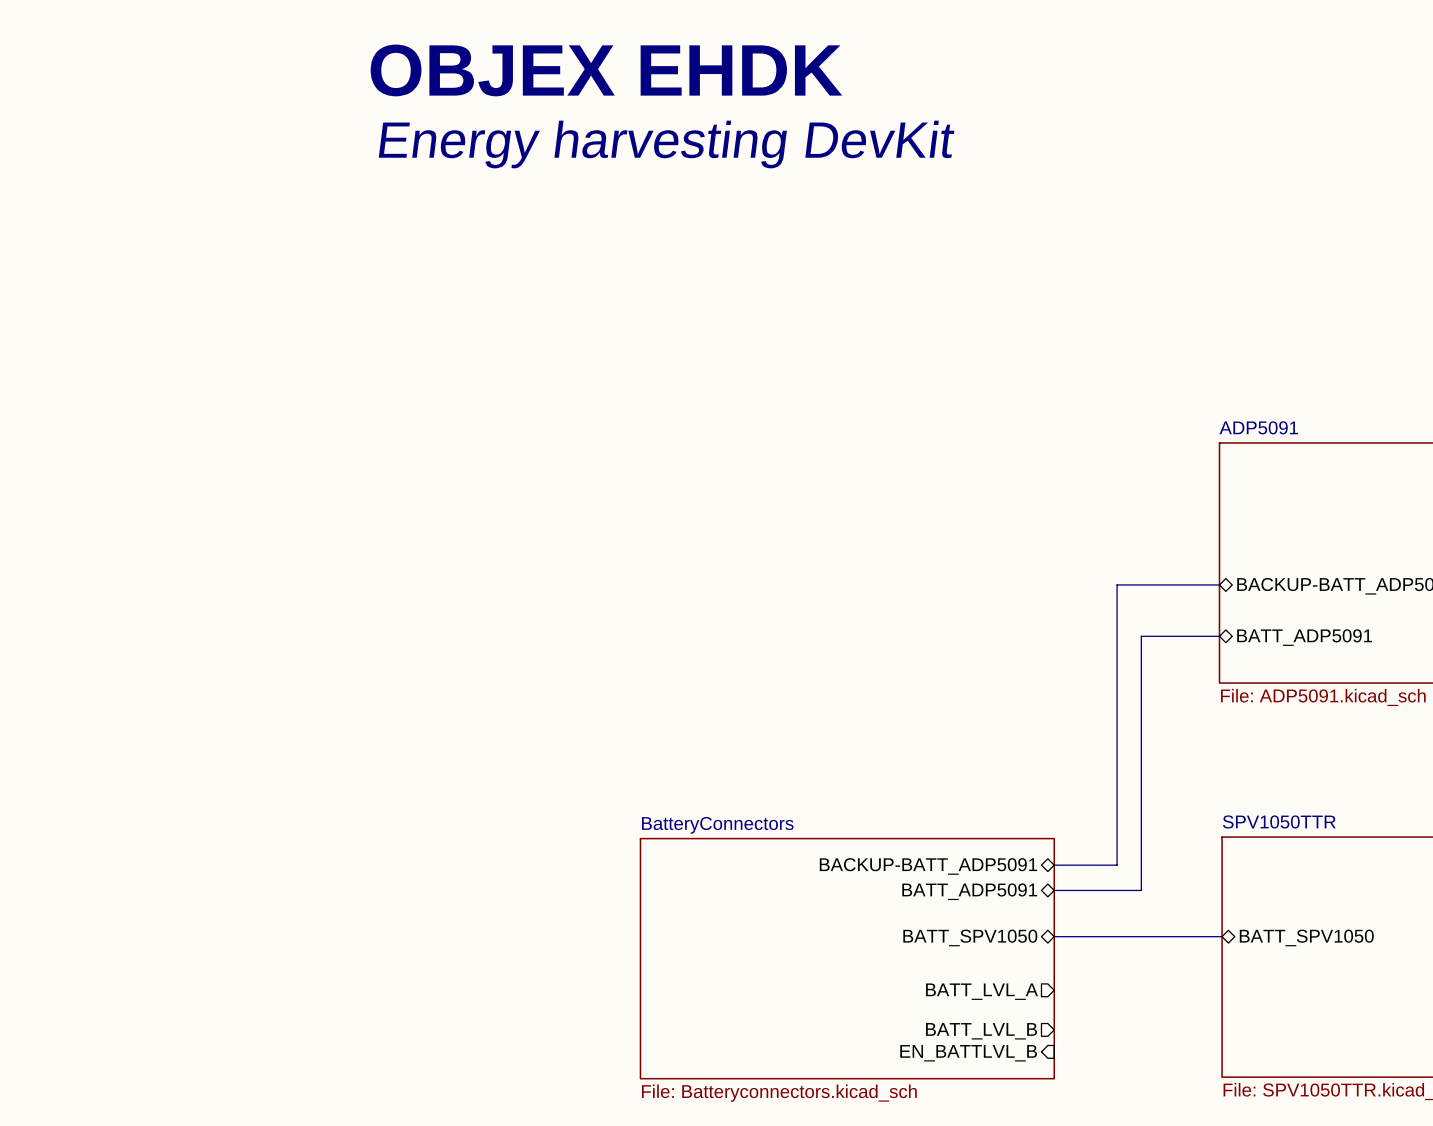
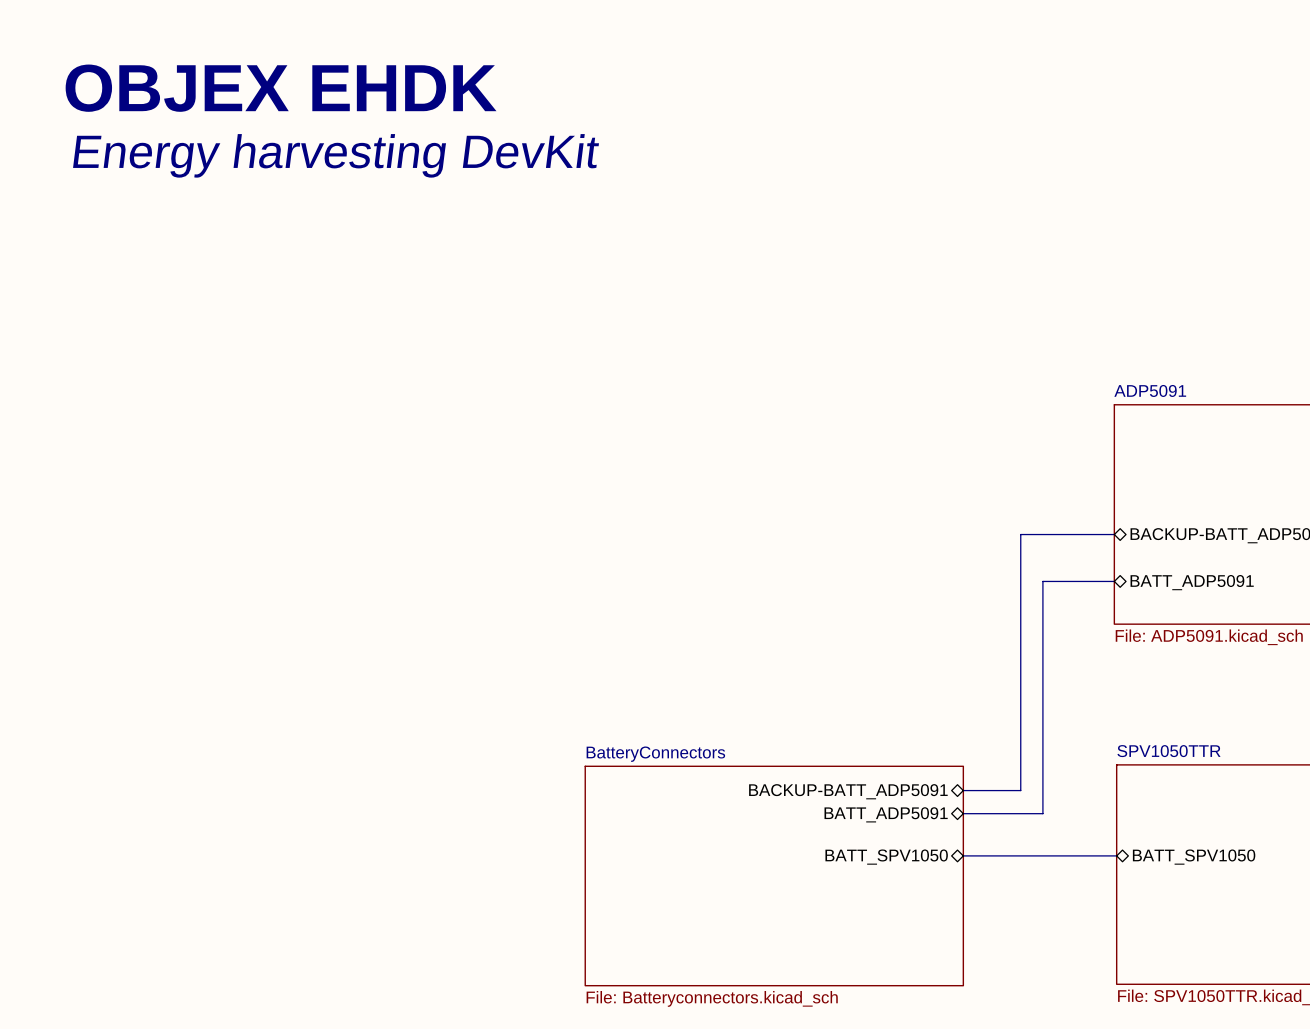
text: OBJEX EHDK (606, 70) -> none
text: none -> OBJEX EHDK (281, 88)
text: Energy harvesting DevKit (666, 144) -> none
text: none -> Energy harvesting DevKit (336, 155)
sheet pin: BATT_LVL_A (982, 991) -> none
sheet pin: BATT_LVL_B (981, 1031) -> none
sheet pin: EN_BATTLVL_B (968, 1053) -> none

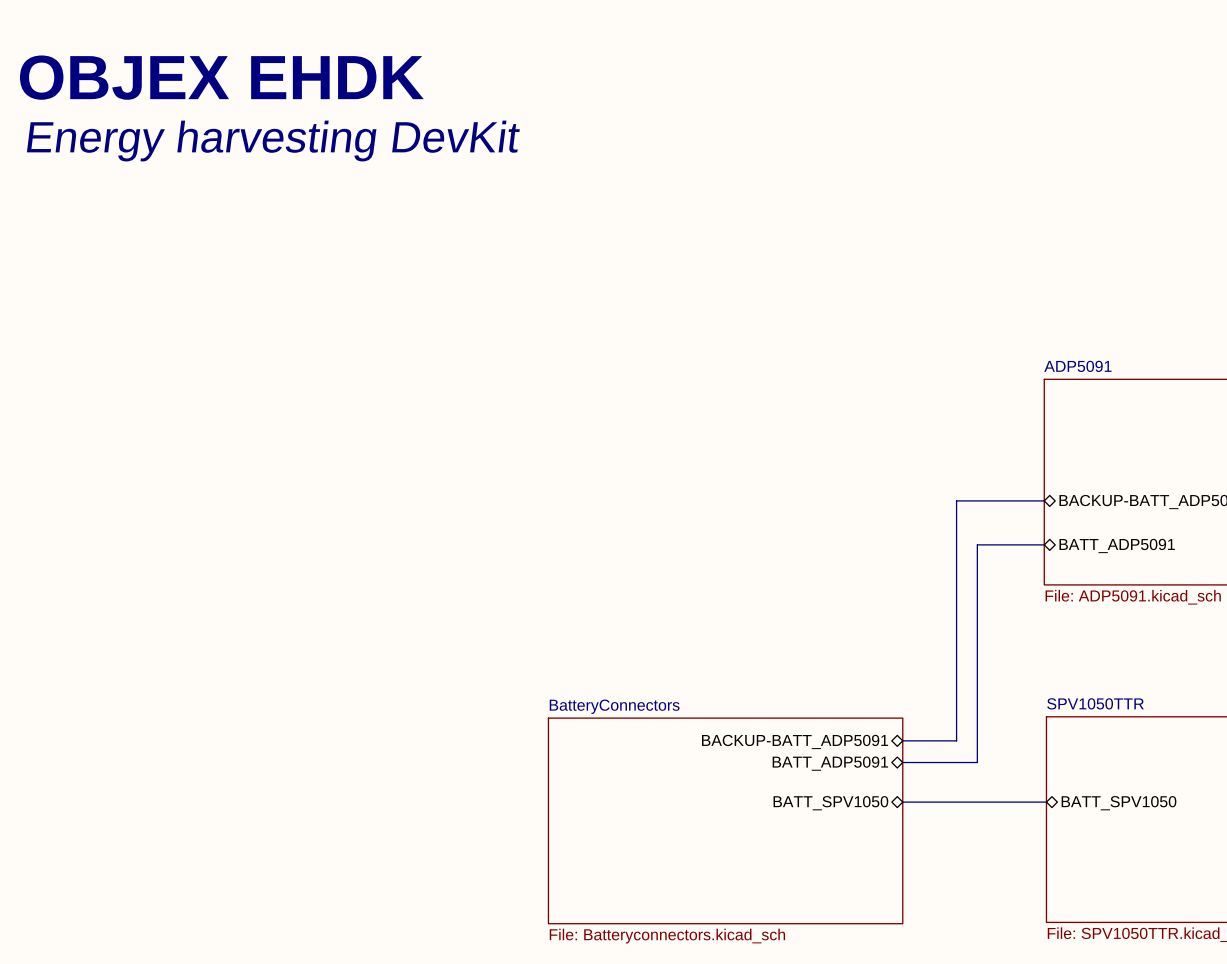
text position: OBJEX EHDK (281, 88) -> OBJEX EHDK (221, 77)
text position: Energy harvesting DevKit (336, 155) -> Energy harvesting DevKit (273, 141)

